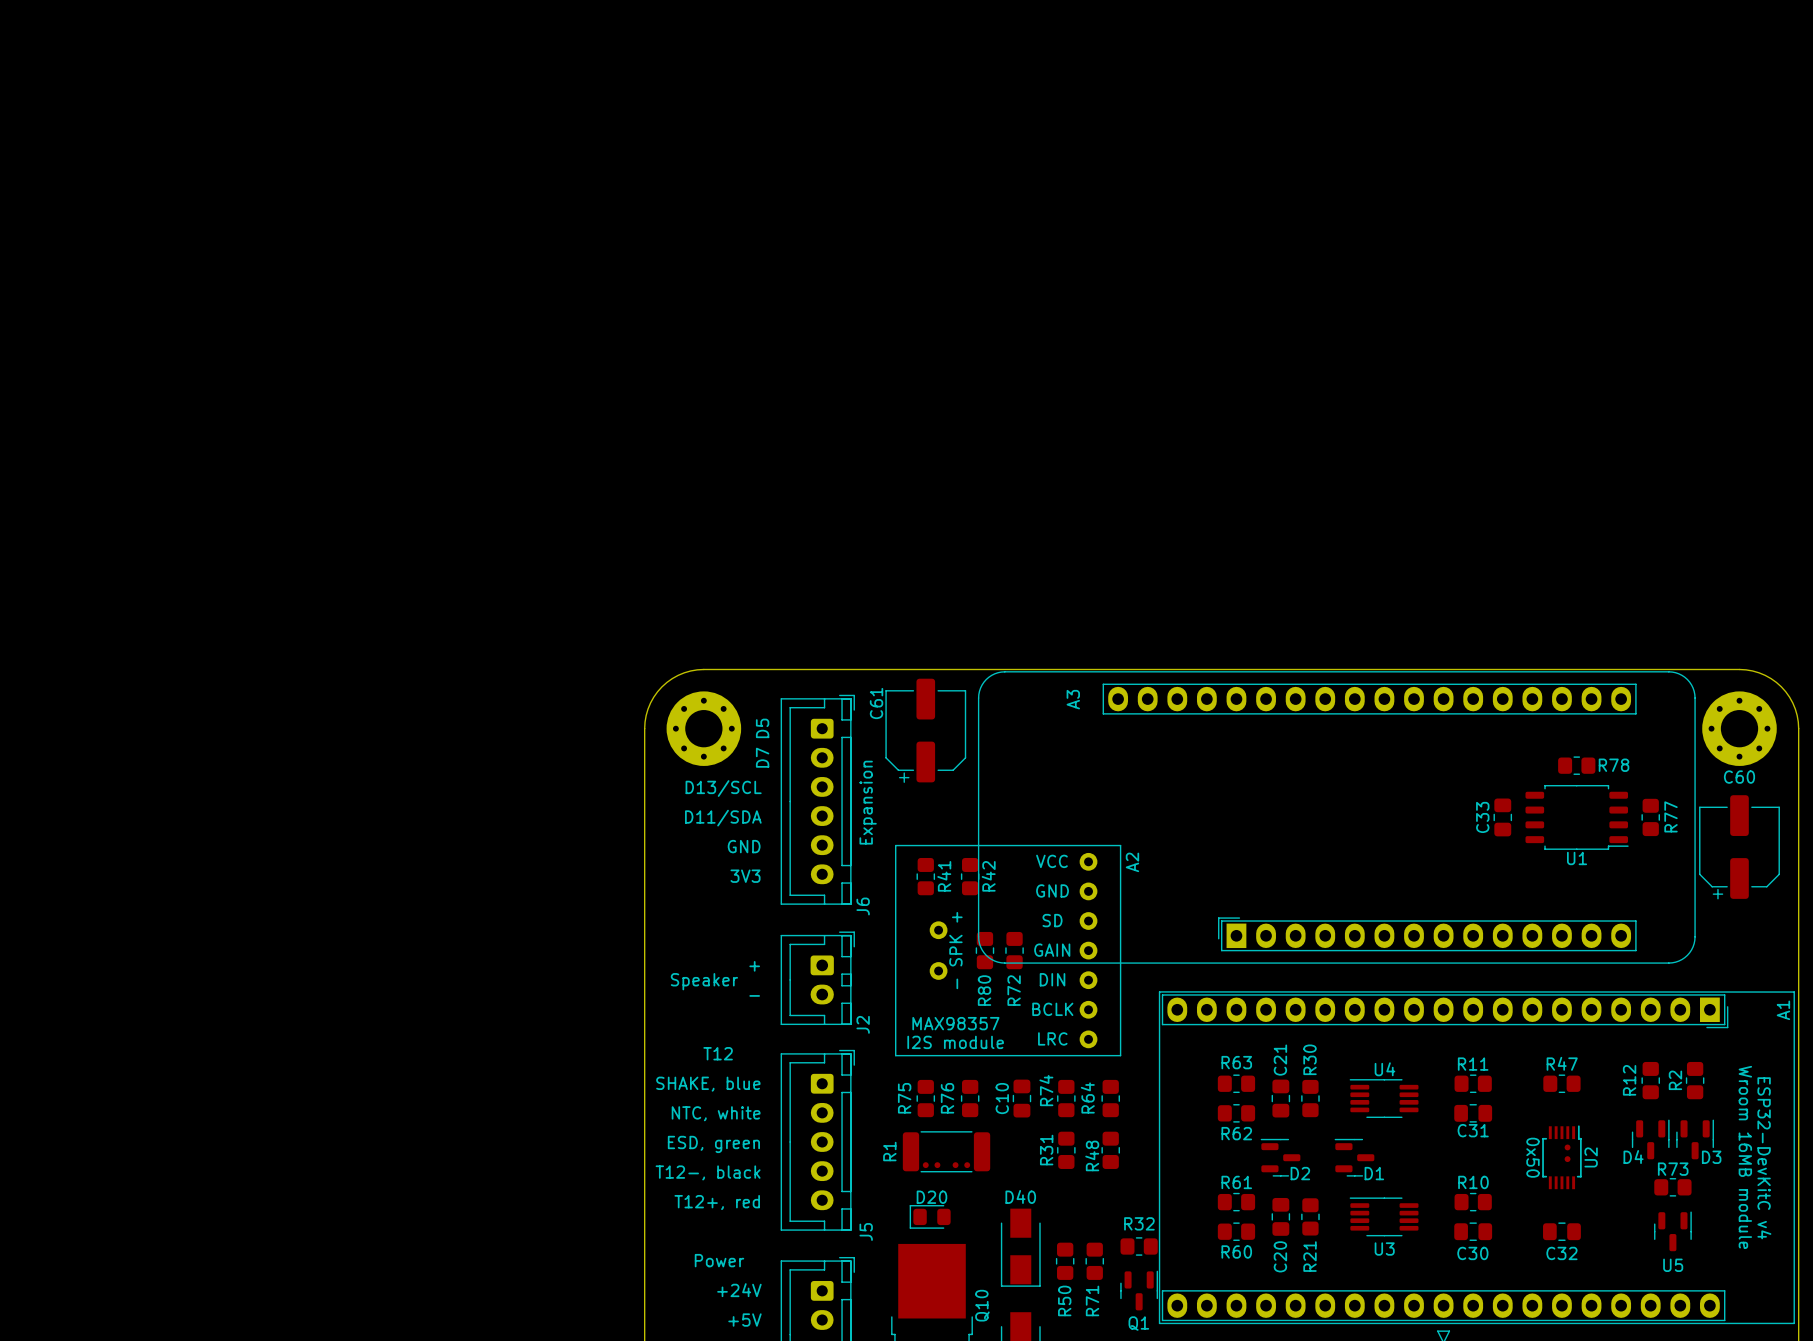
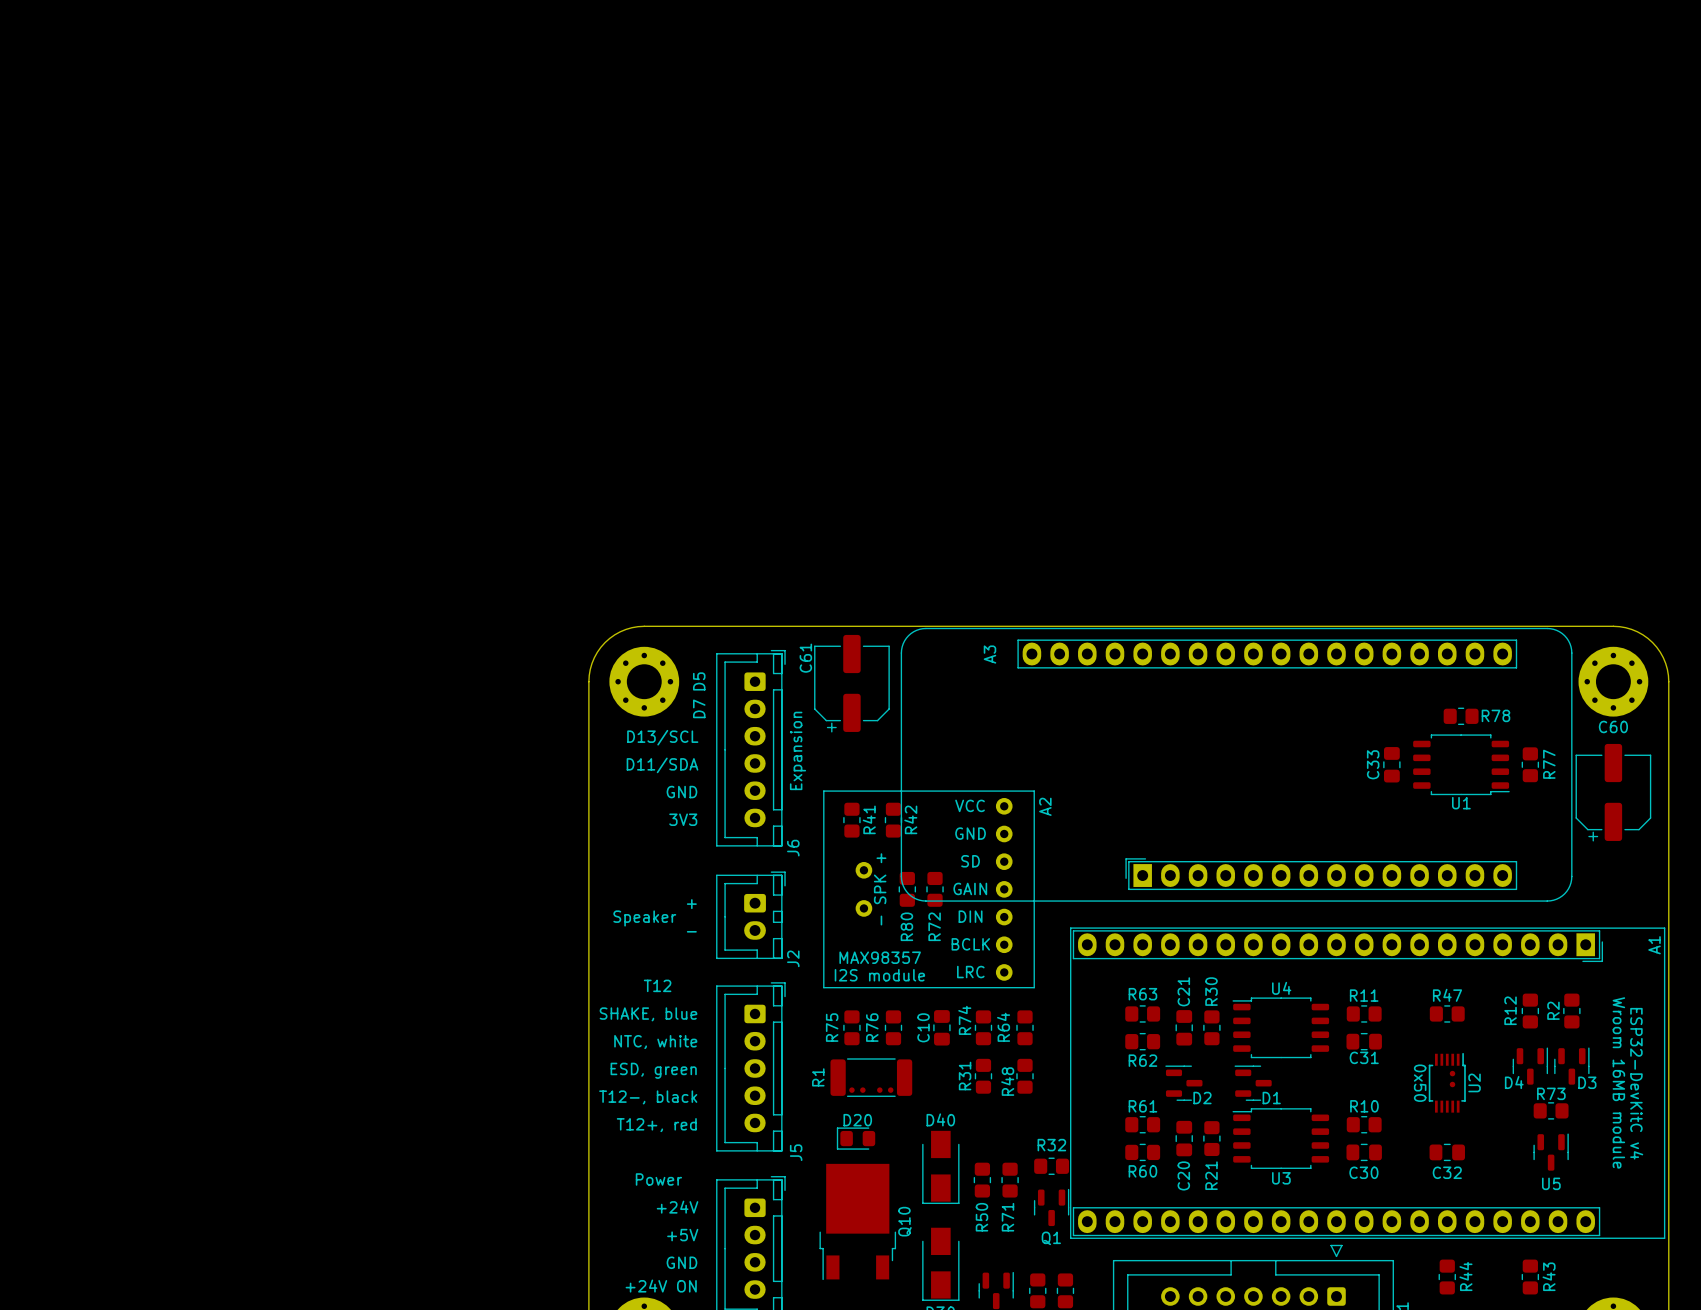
U4 footprint: [1349, 1079, 1419, 1119] -> [1232, 997, 1330, 1059]
U3 footprint: [1349, 1197, 1419, 1237] -> [1232, 1108, 1330, 1169]

